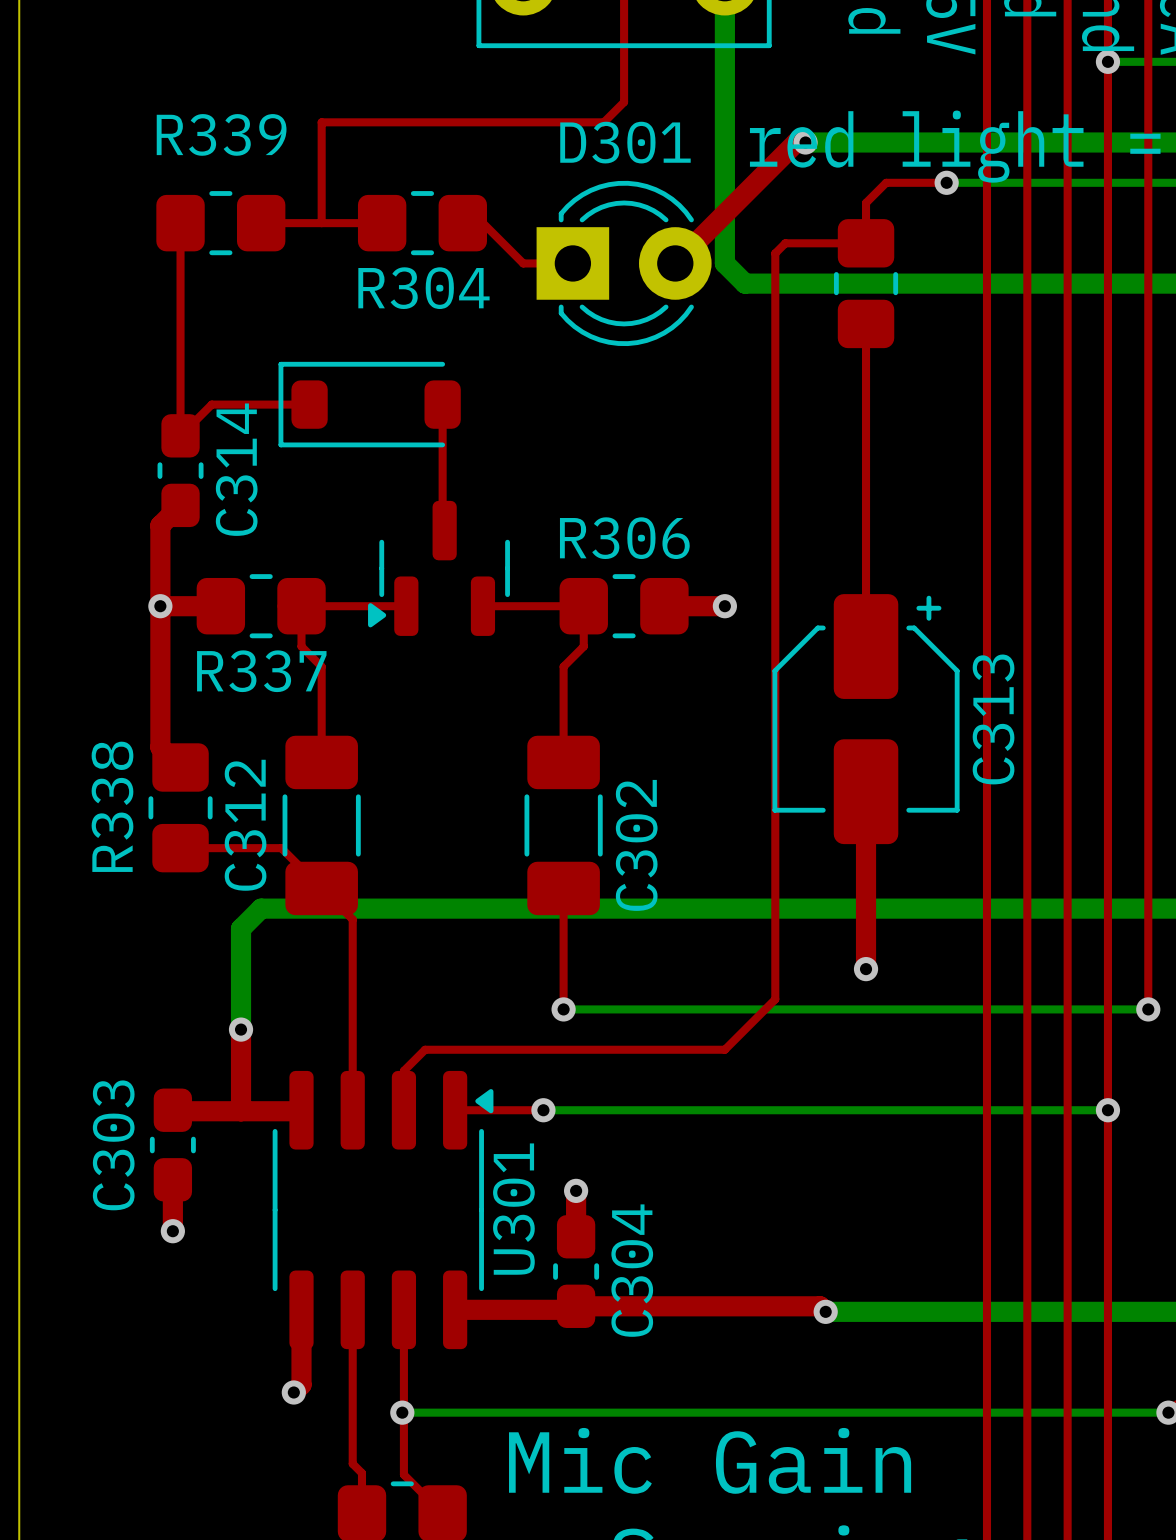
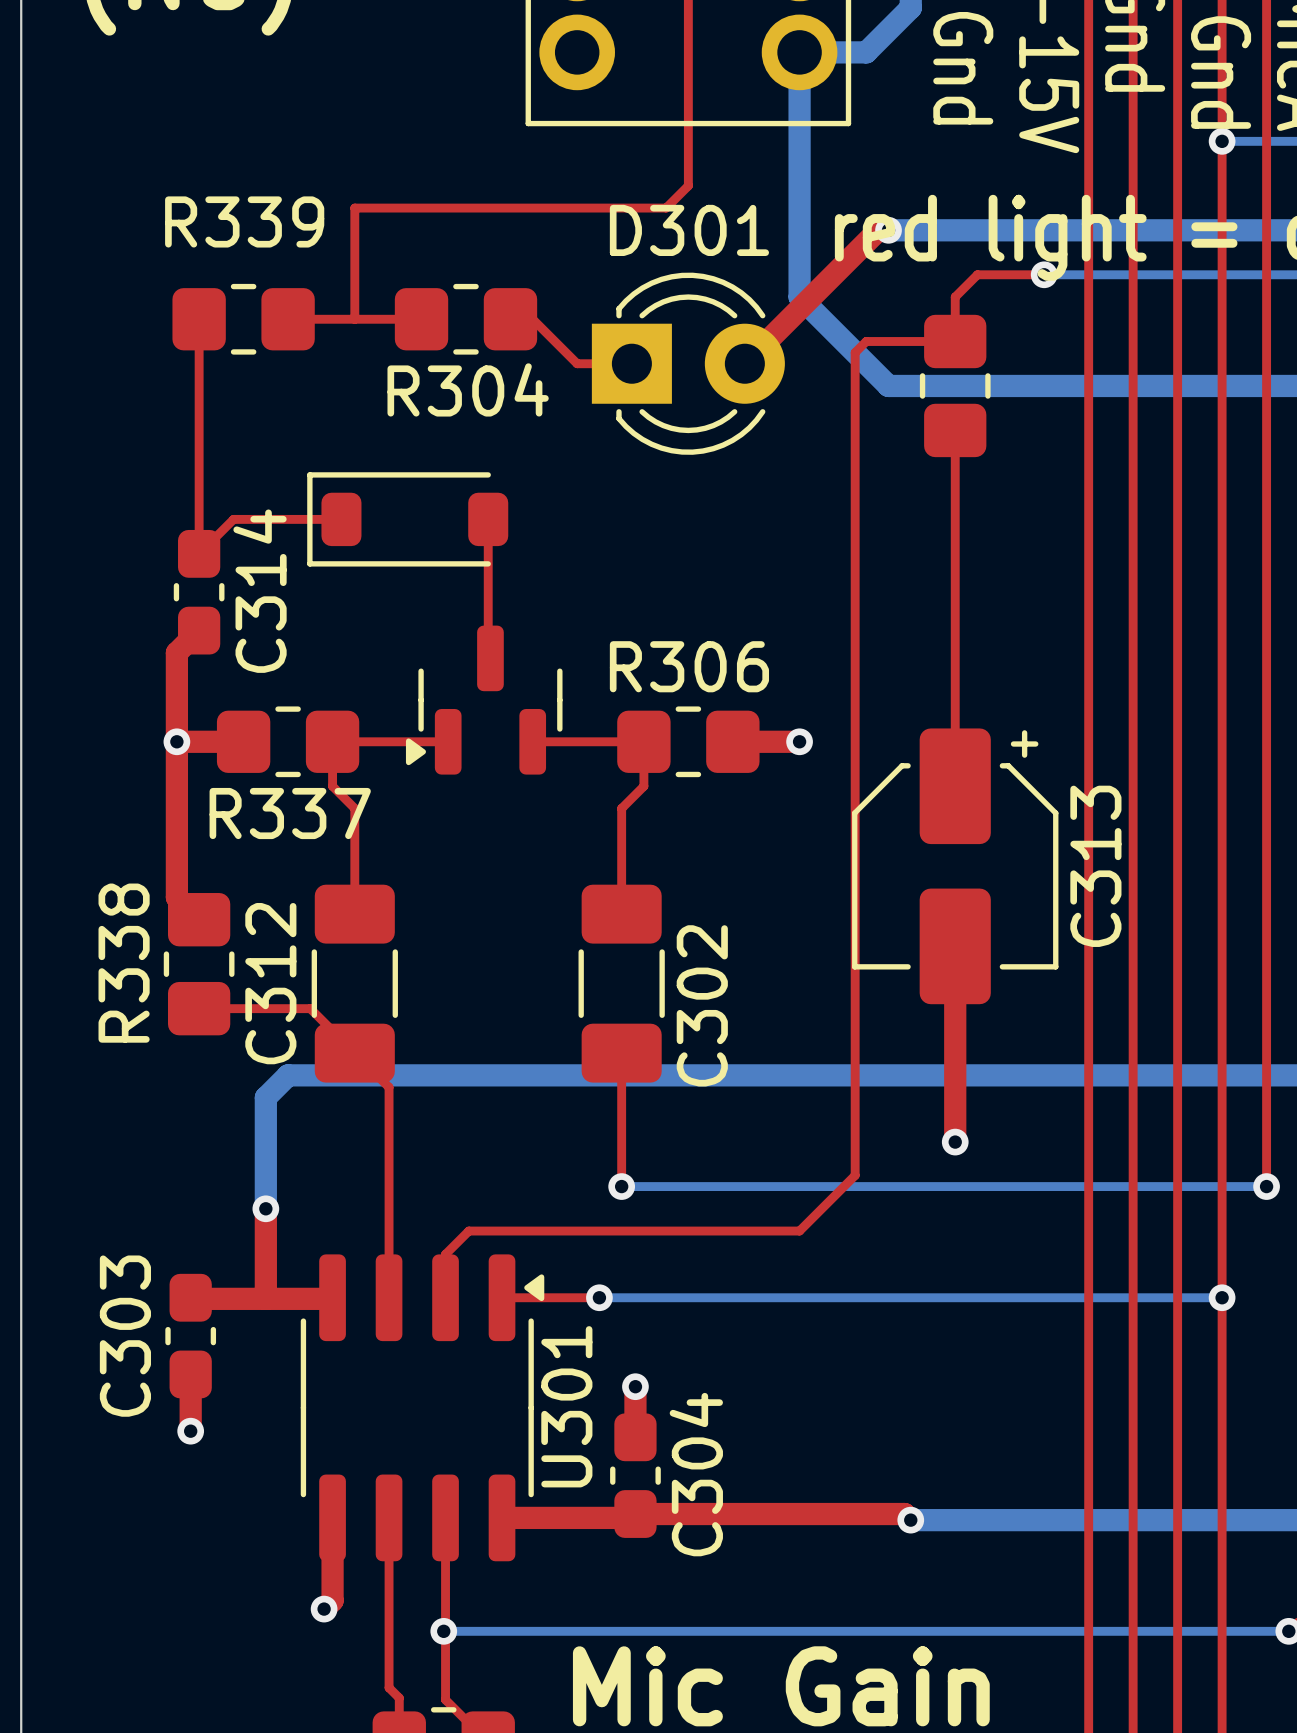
bottom track: (724, 202) (724, 263) (745, 283) (805, 283) -> (799, 297) (888, 385)

